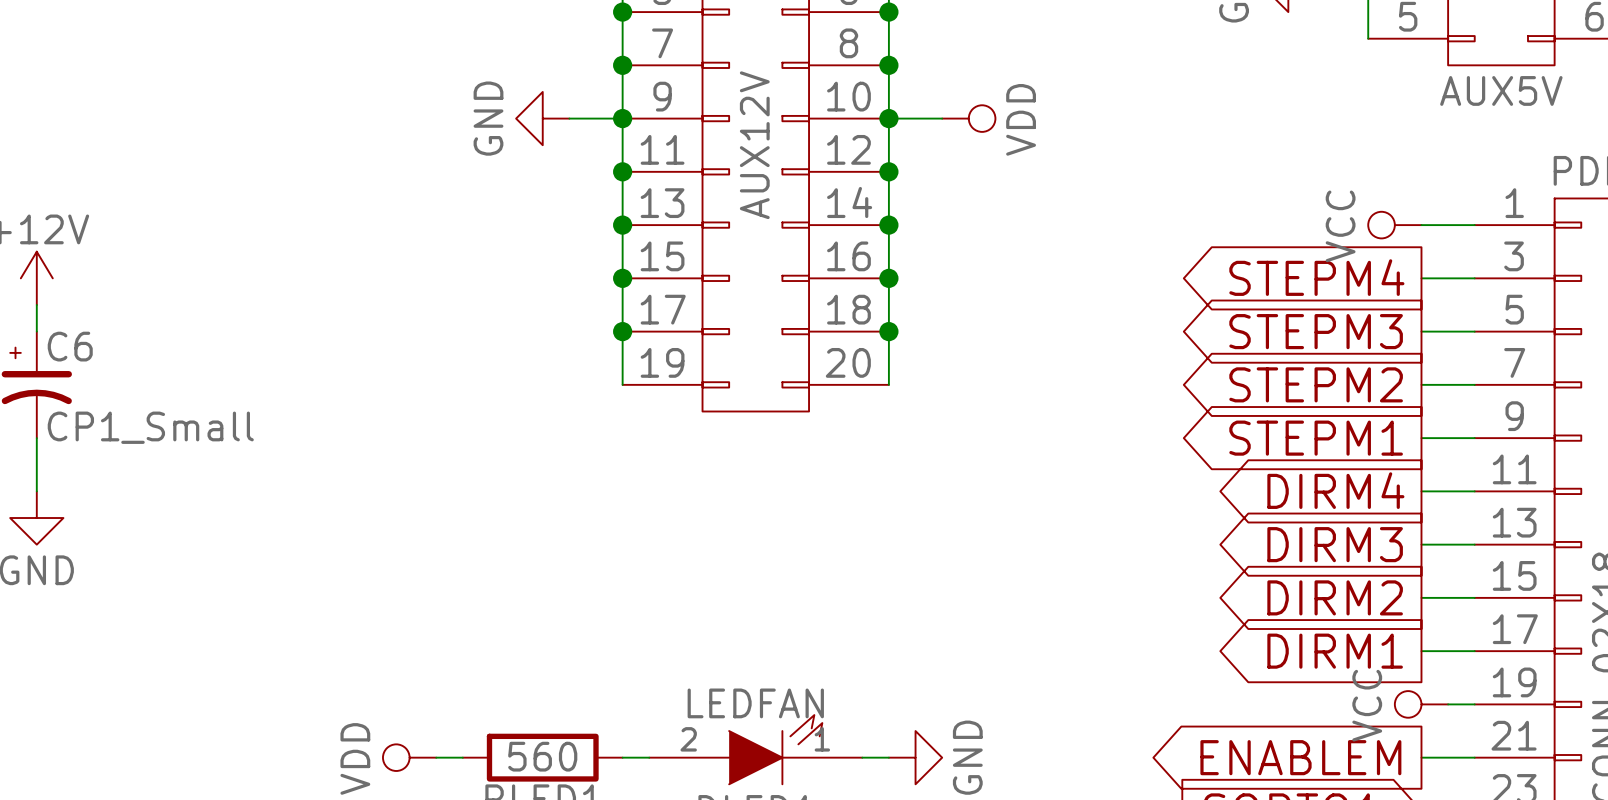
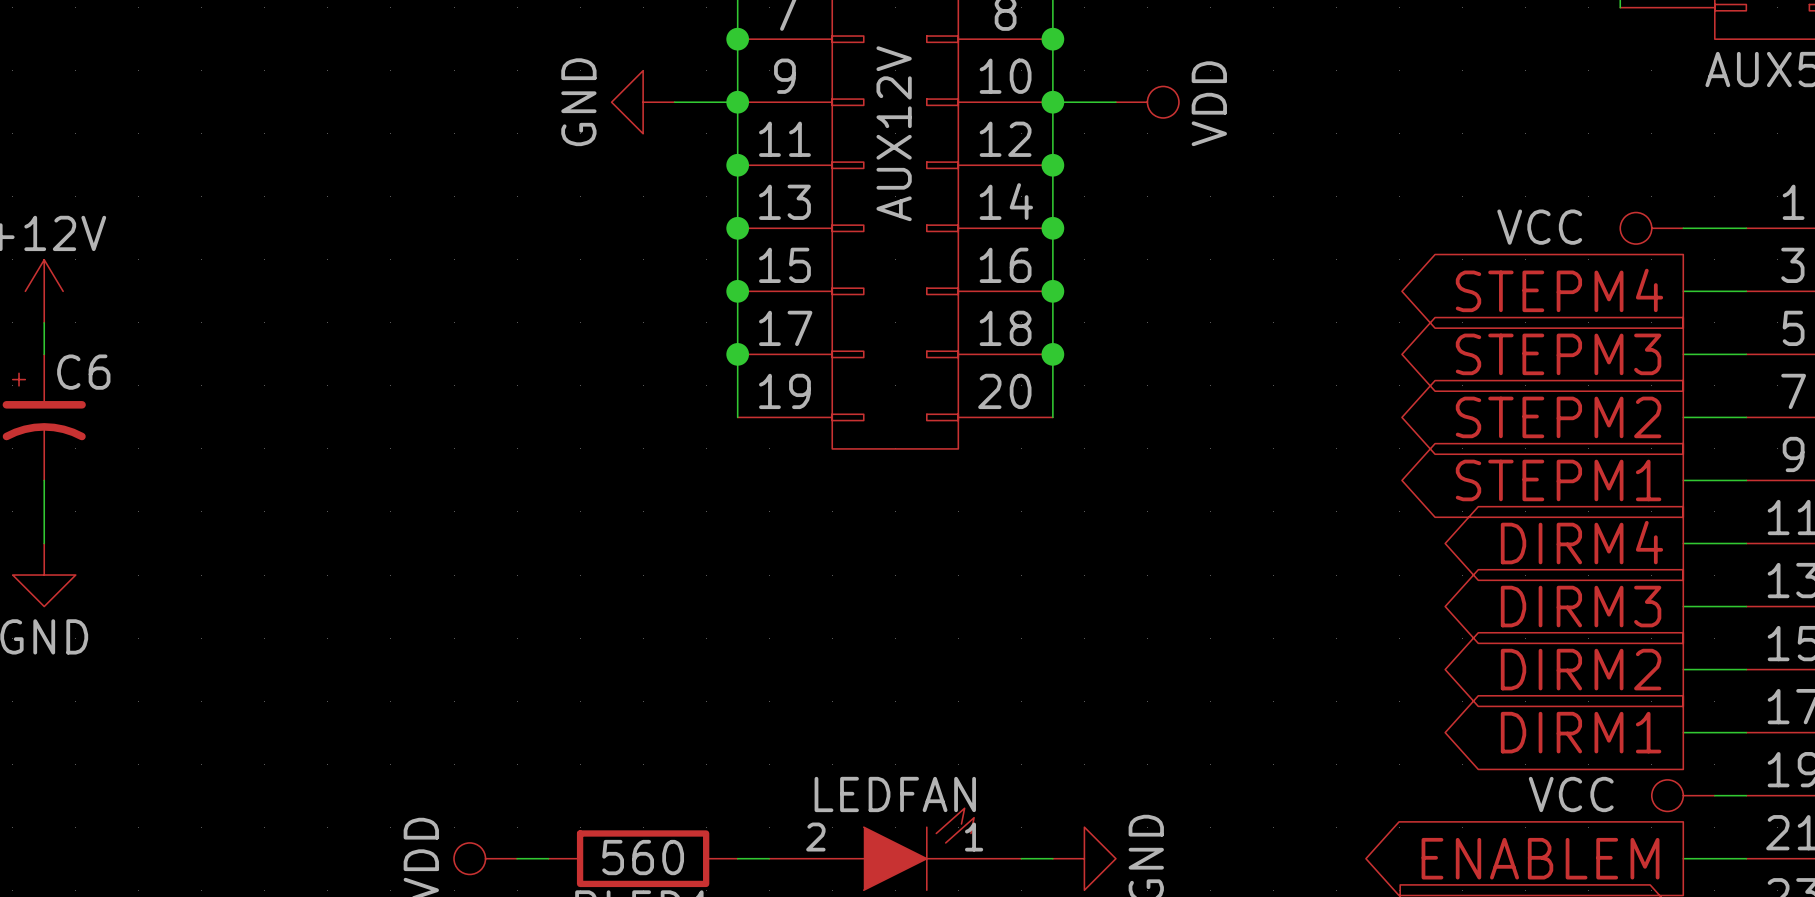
power symbol text rotation: 0° (1340, 226) -> 90° clockwise (1539, 227)
C6 value: CP1_Small (150, 427) -> none
power symbol text rotation: 0° (1367, 705) -> 90° clockwise (1571, 794)

